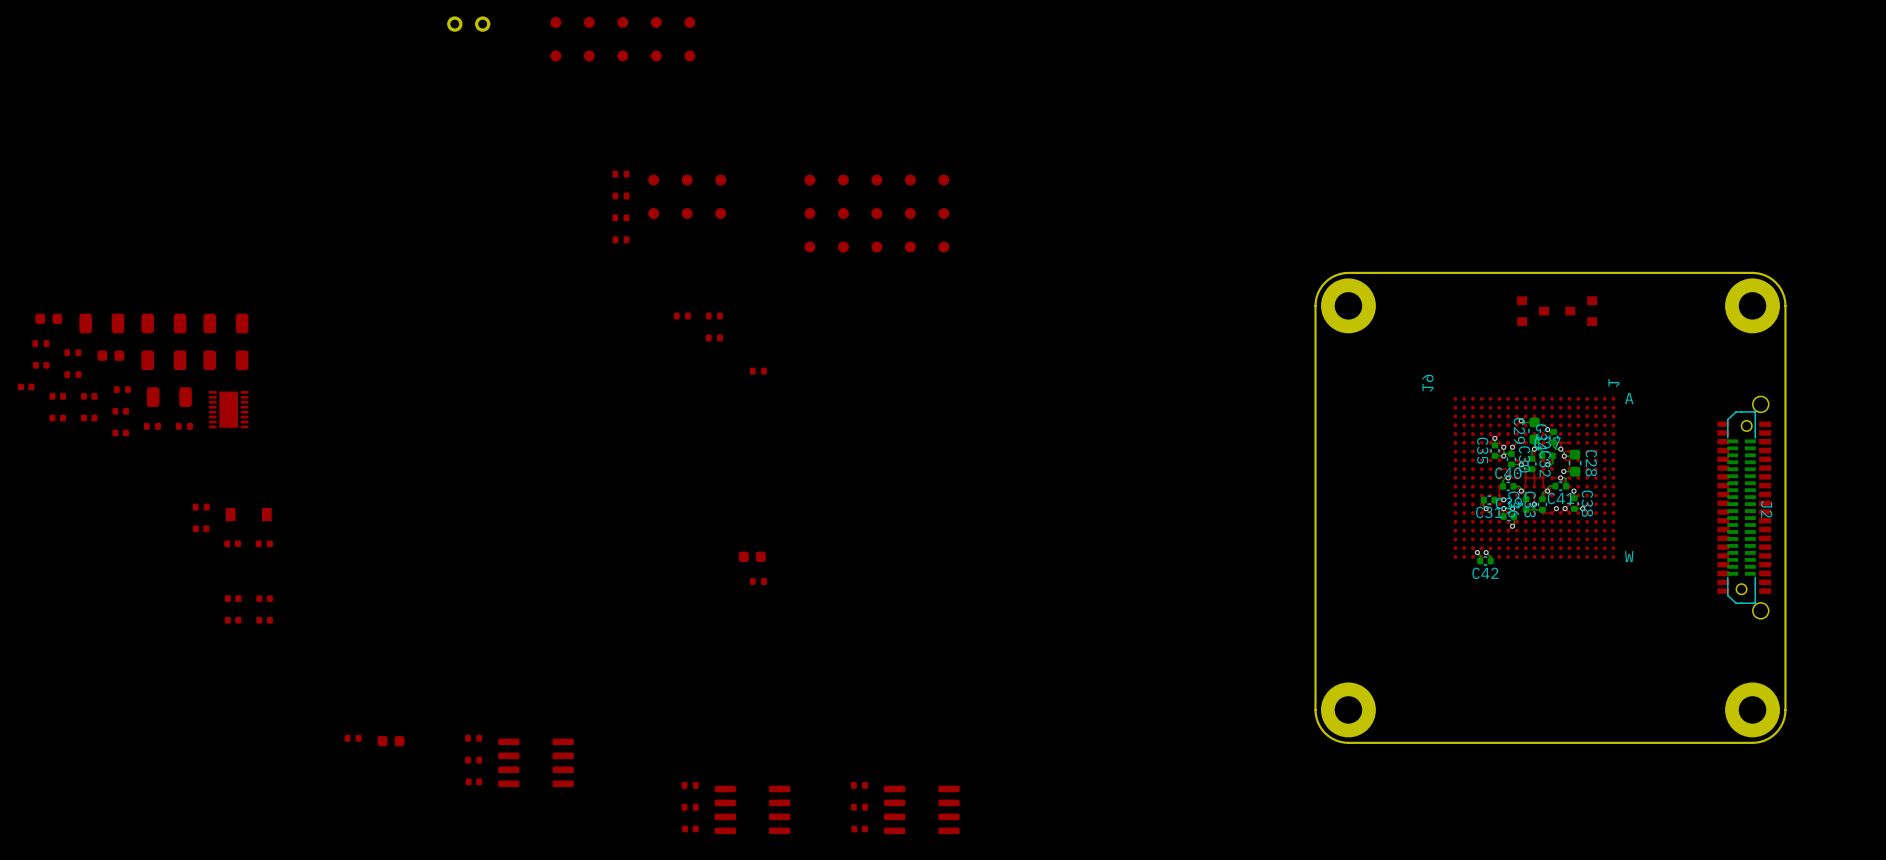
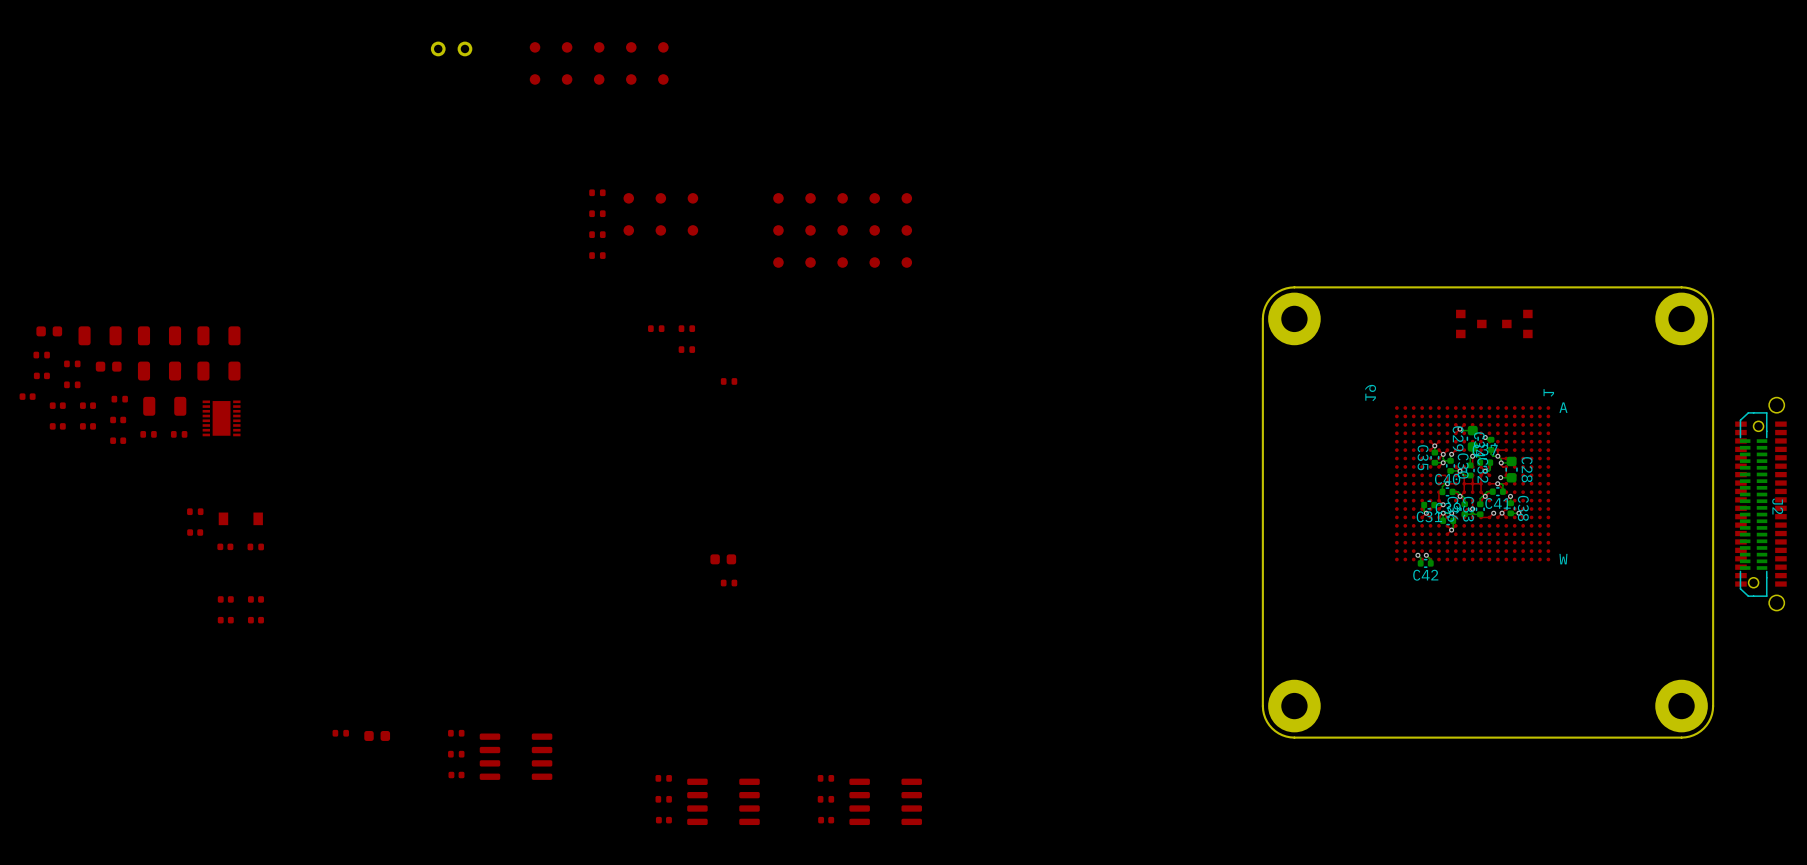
J2 position: (1741, 507) -> (1753, 504)
part position: (1744, 507) -> (1760, 504)

